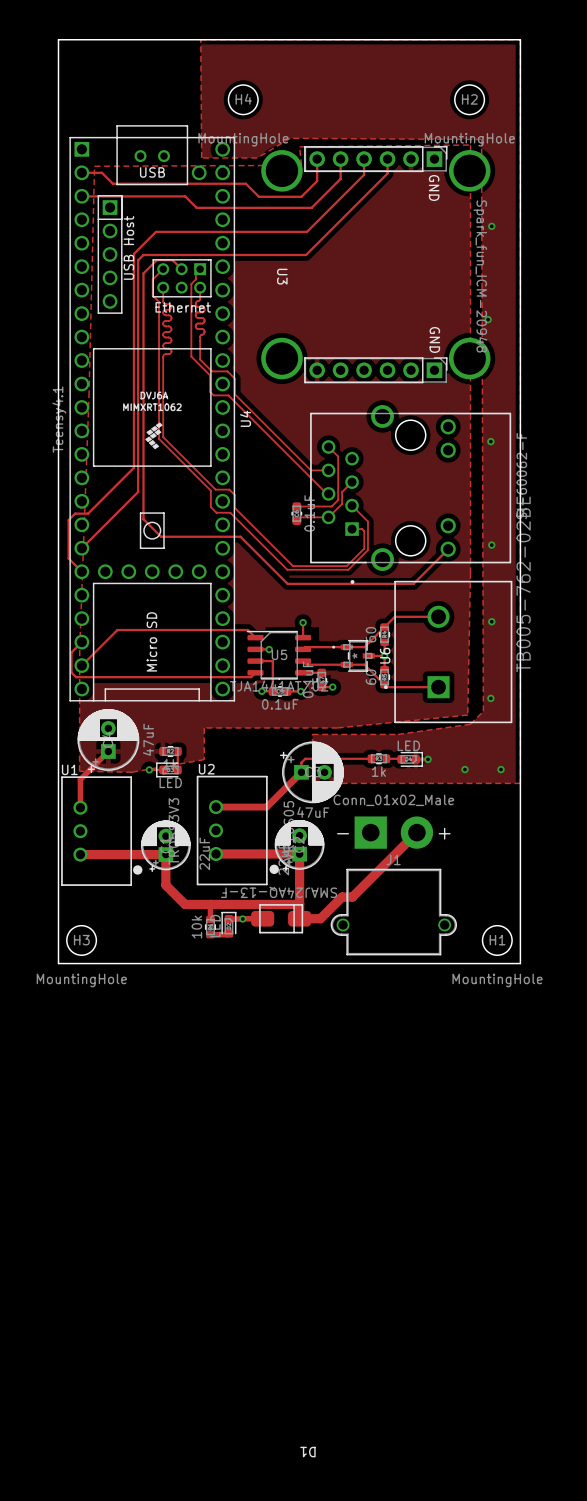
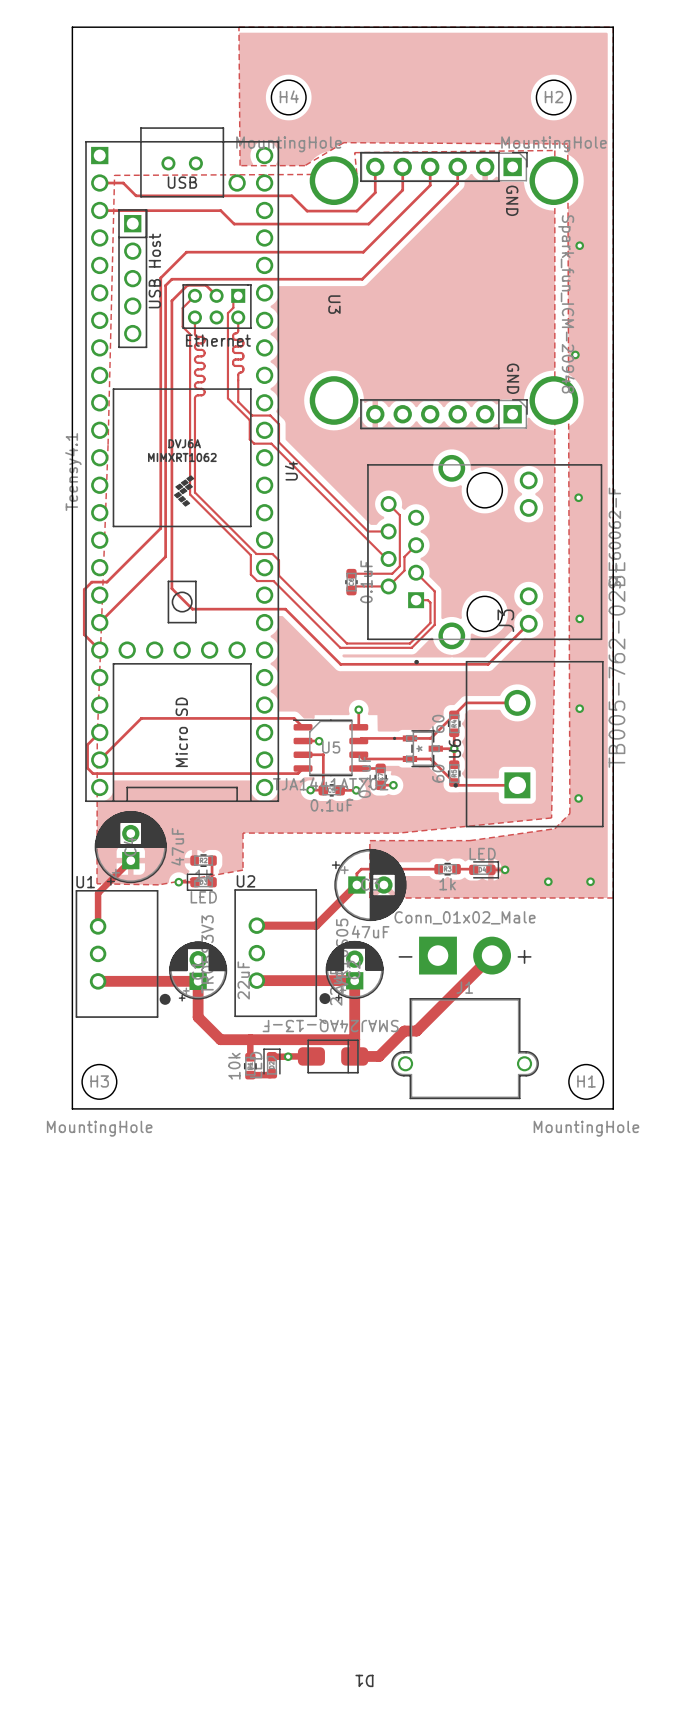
J3 name: none -> J3 (505, 620)

